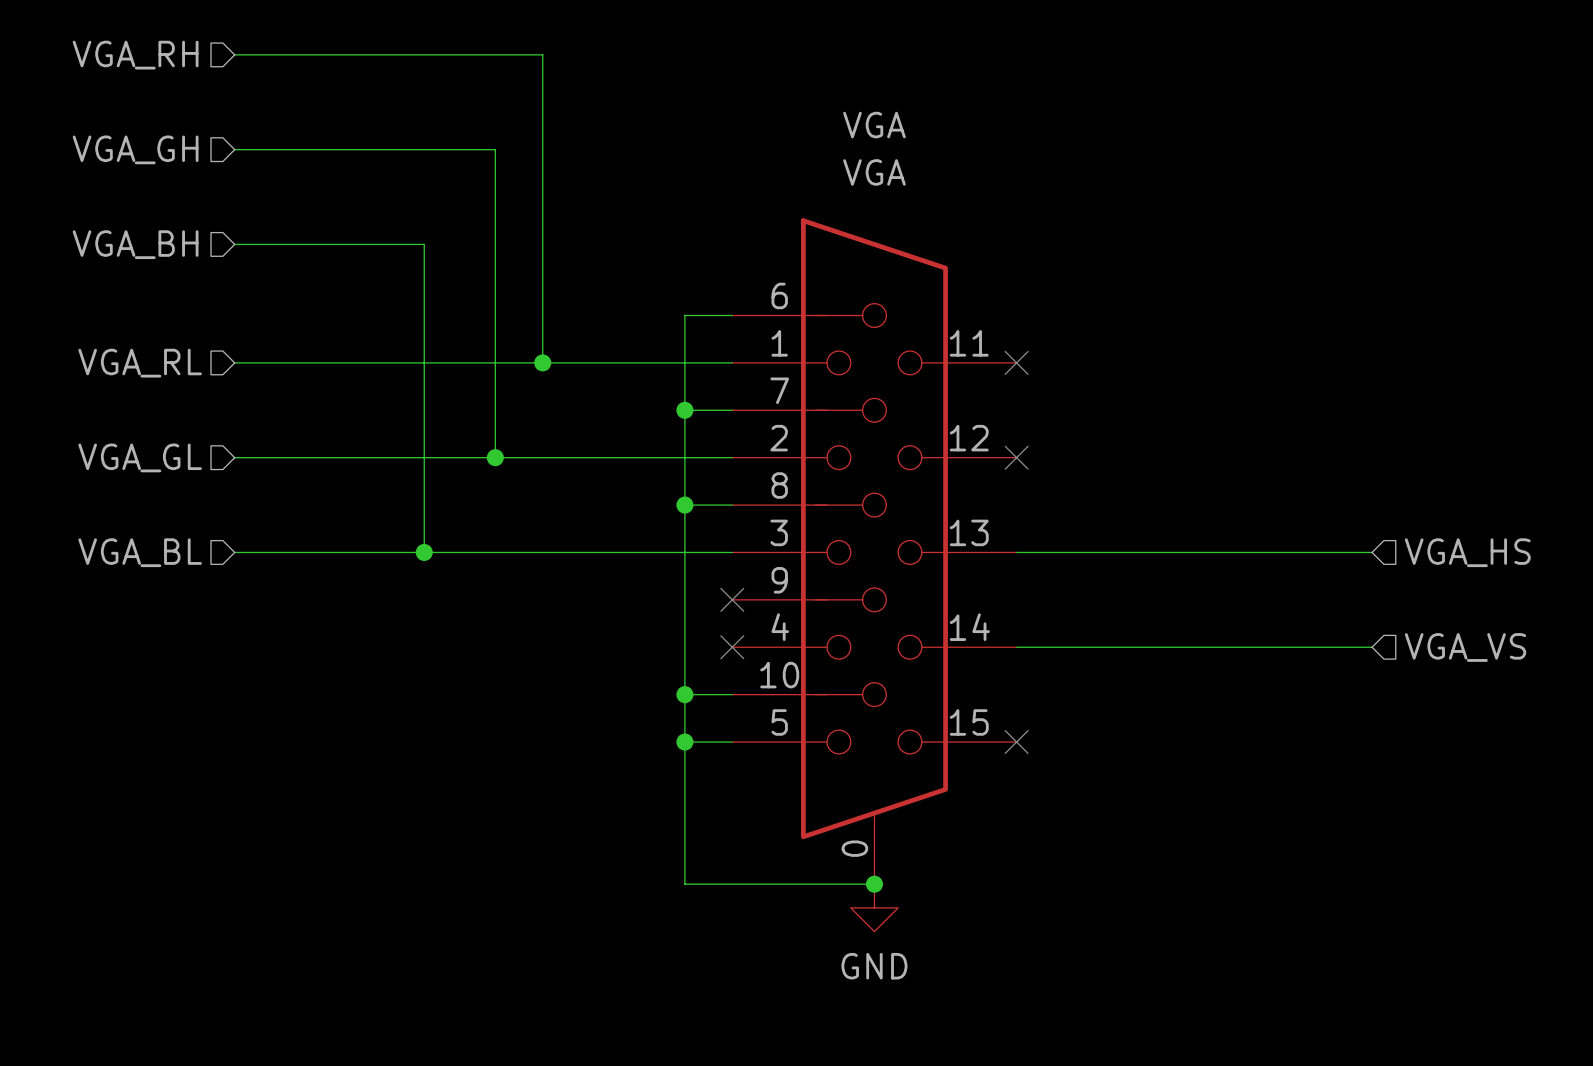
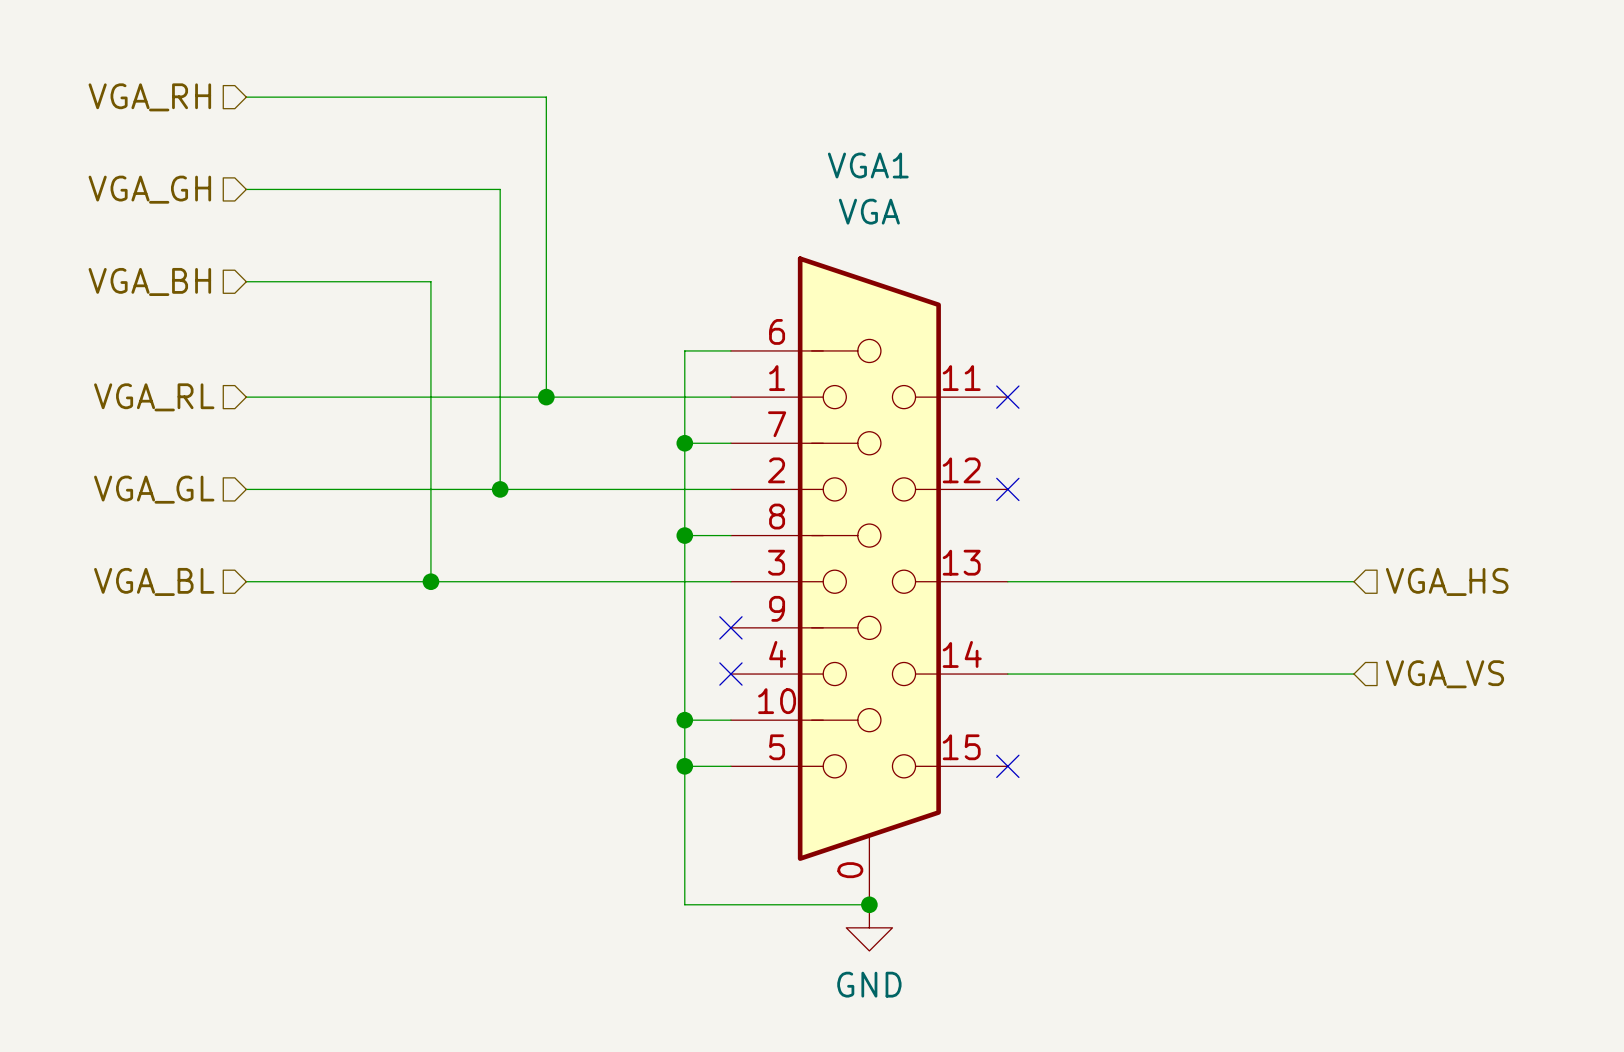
VGA name: VGA (874, 125) -> VGA1 (868, 165)

